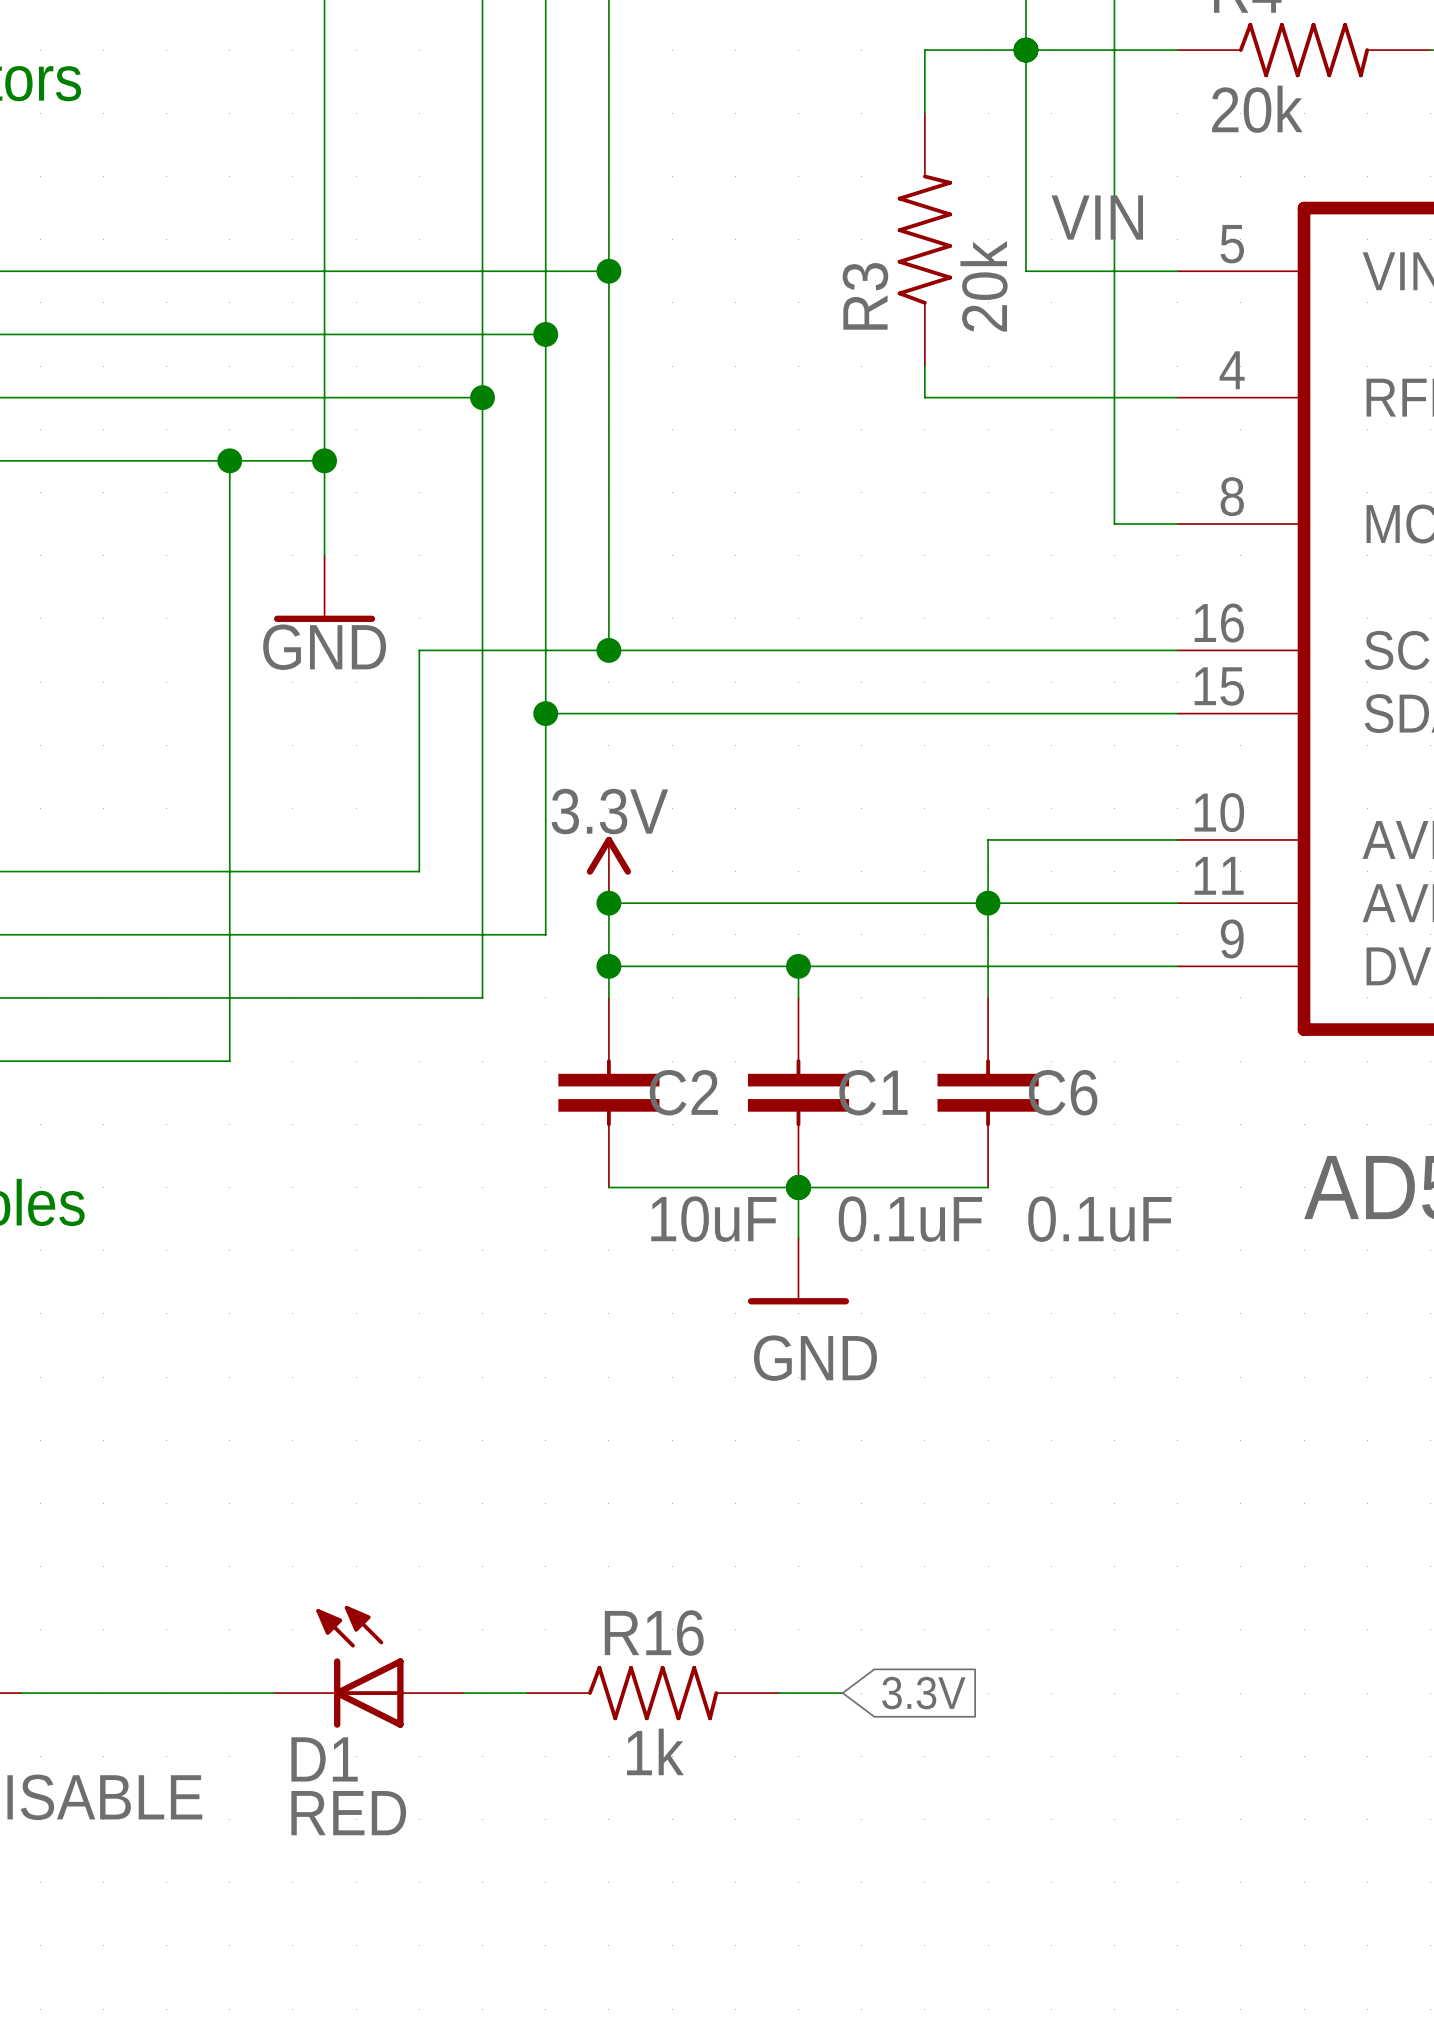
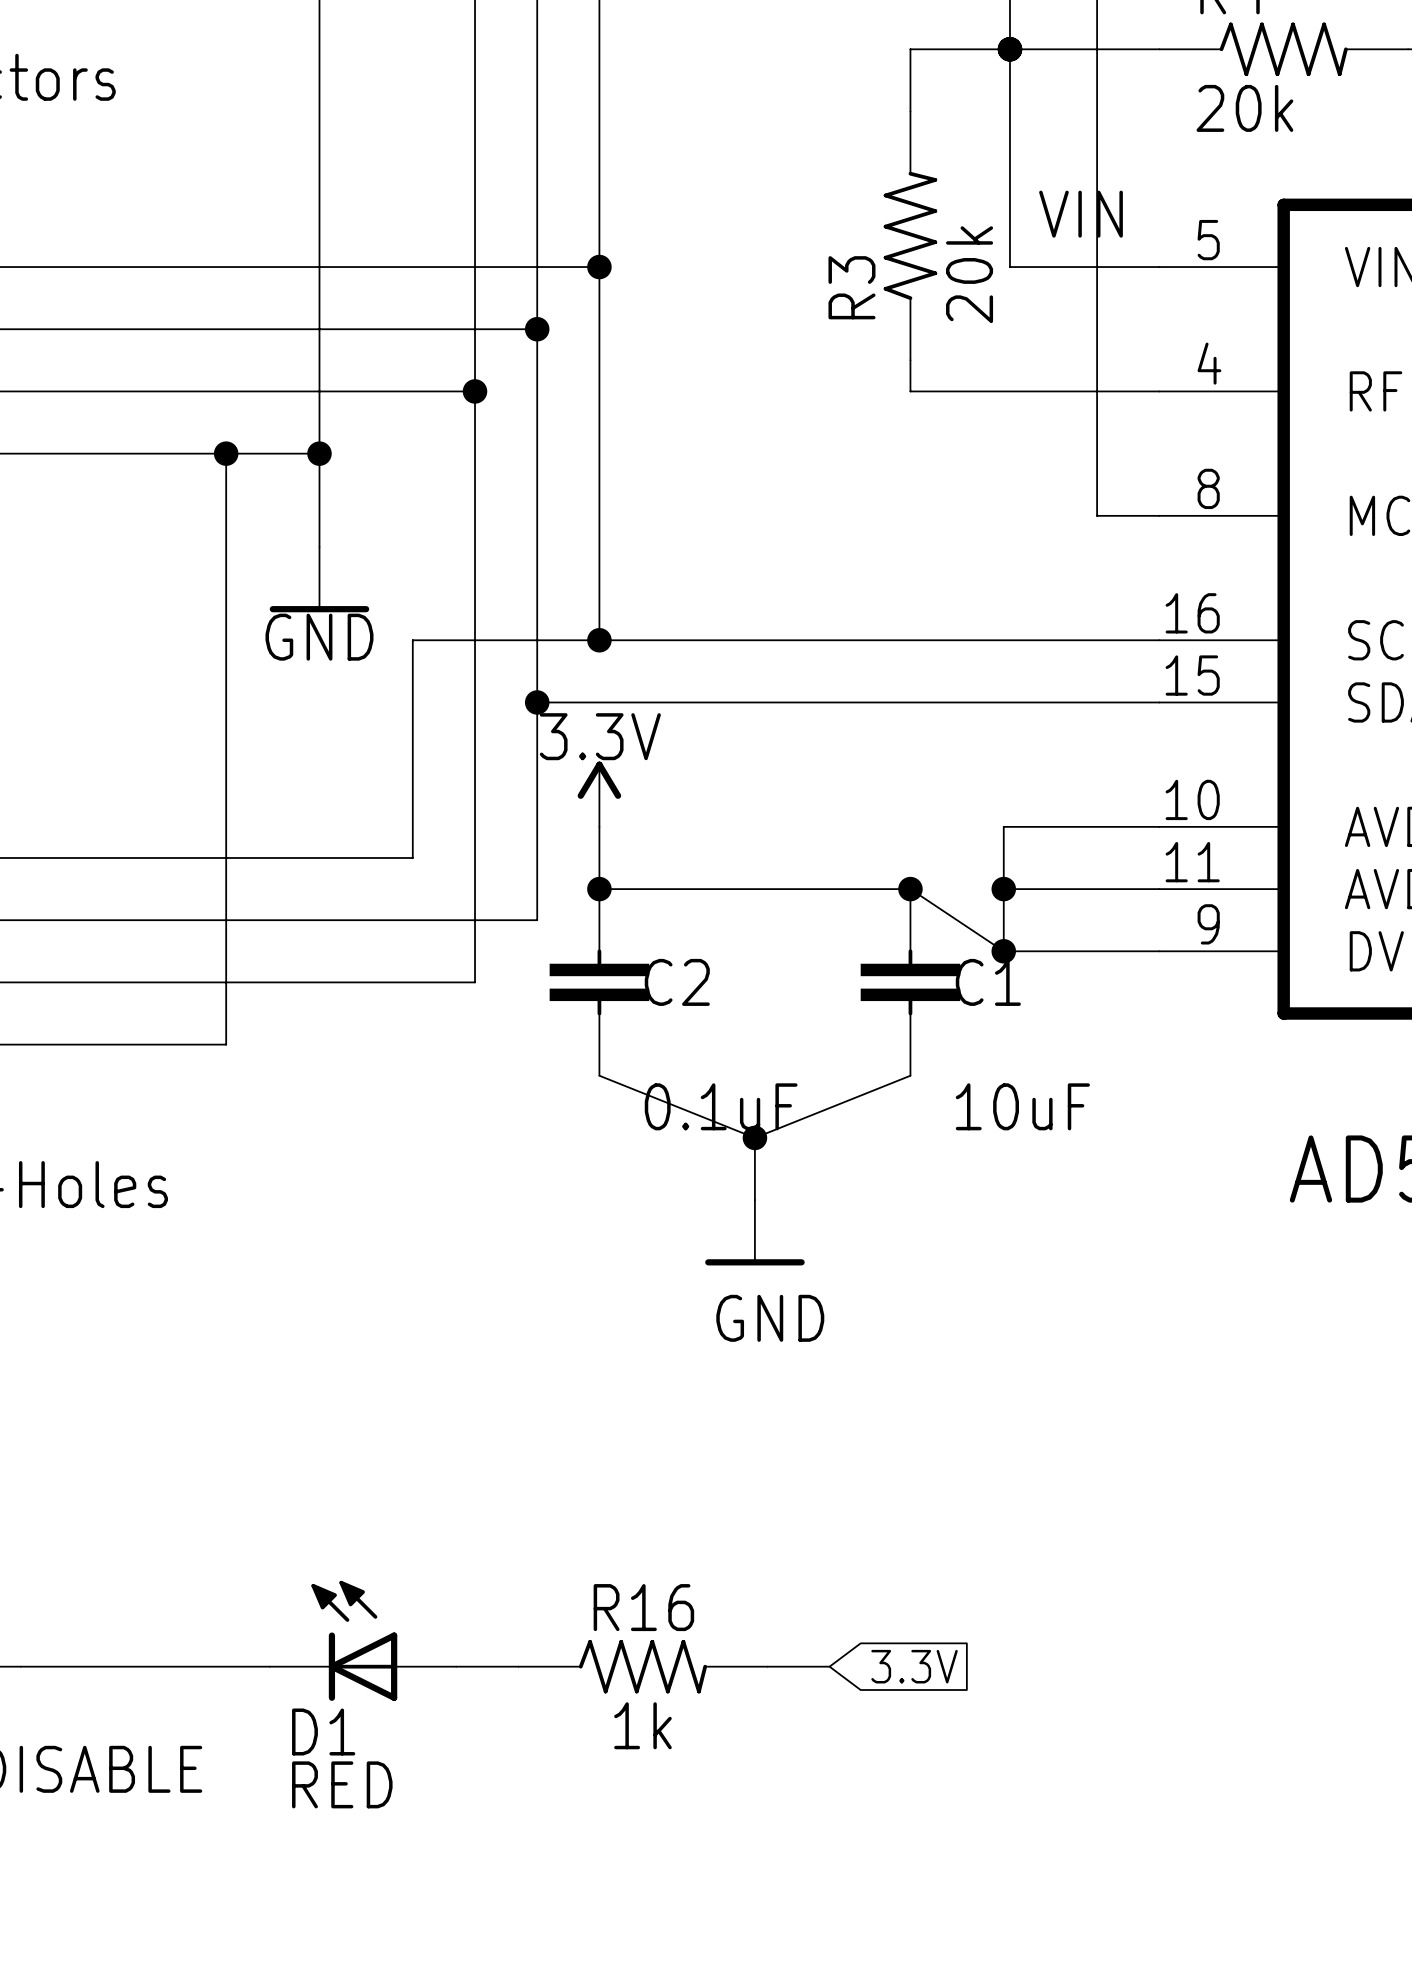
wire: (1019, 839) (988, 839) (988, 997) -> none
power symbol position: 3.3V (608, 870) -> 3.3V (599, 794)
wire: (924, 903) (1019, 903) -> (910, 889) (1003, 951) (1003, 826)
junction: none -> (910, 889)
junction: (988, 903) -> none
junction: none -> (1003, 889)
wire: (608, 966) (1019, 966) -> none
junction: (608, 966) -> none
wire: (798, 966) (798, 997) -> none
junction: (798, 966) -> none
junction: none -> (1003, 951)
wire: none -> (599, 1075) (754, 1137)
C2 position: (608, 1092) -> (599, 982)
C1 position: (798, 1092) -> (910, 982)
wire: none -> (910, 1075) (754, 1137)
C6: 0.1uF (988, 1092) -> none
wire: none -> (754, 1137) (754, 1200)
wire: (608, 1187) (988, 1187) -> none
wire: (798, 1187) (798, 1238) -> none
junction position: (798, 1187) -> (754, 1137)
C2 value: 10uF (713, 1219) -> 0.1uF (721, 1106)
C1 value: 0.1uF (910, 1219) -> 10uF (1022, 1106)
power symbol position: GND (798, 1271) -> GND (754, 1232)

